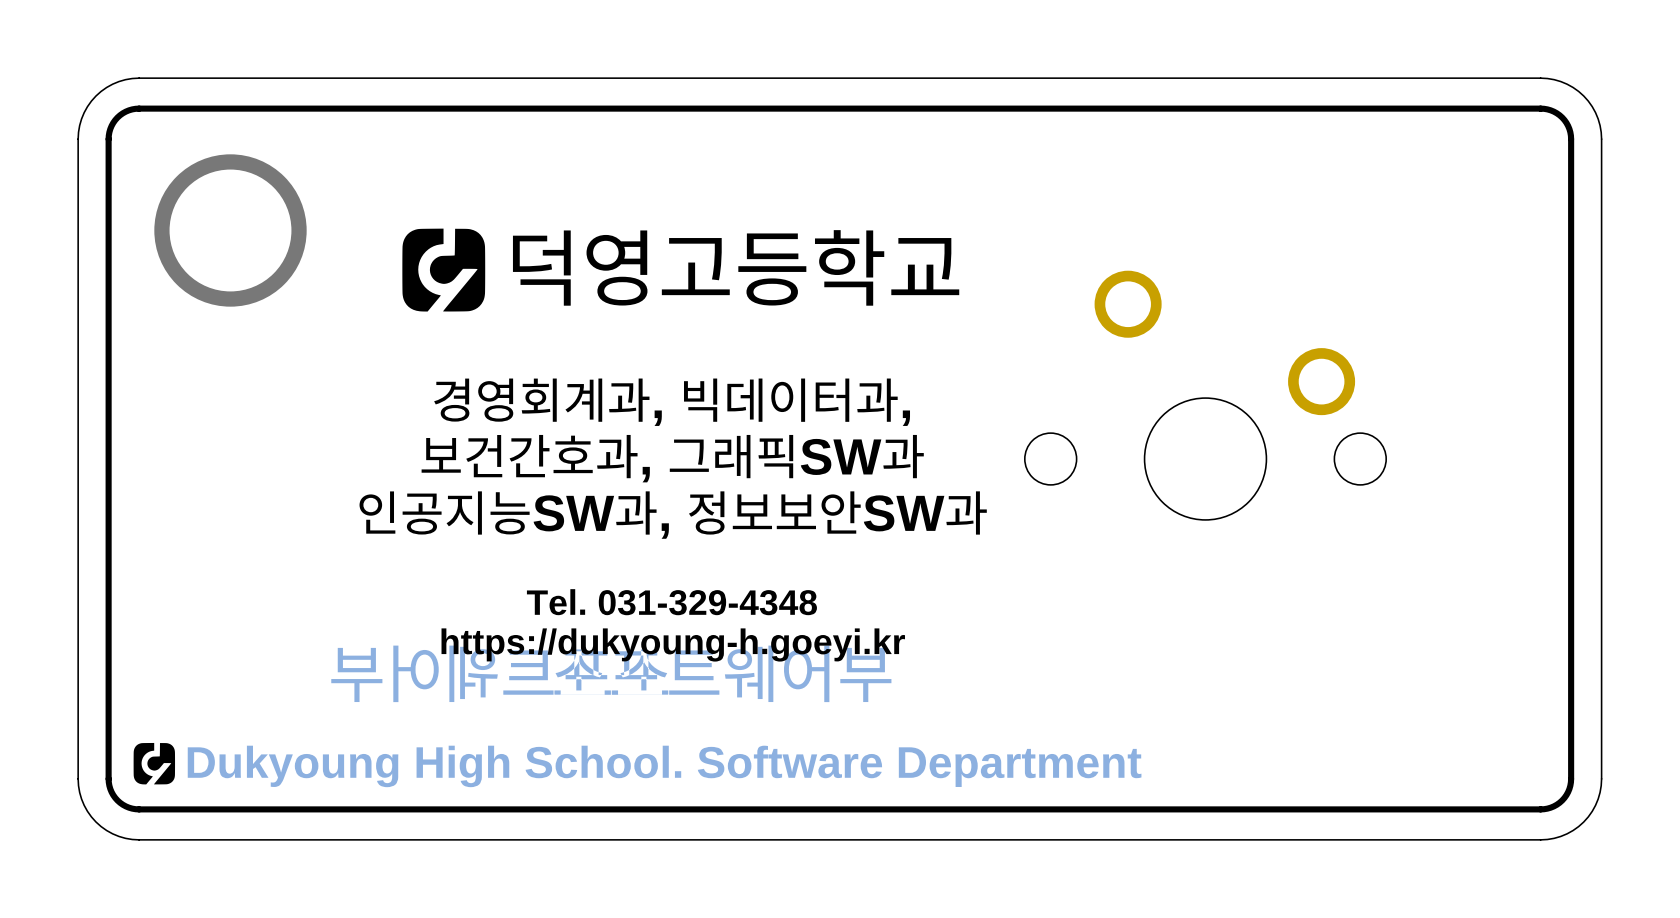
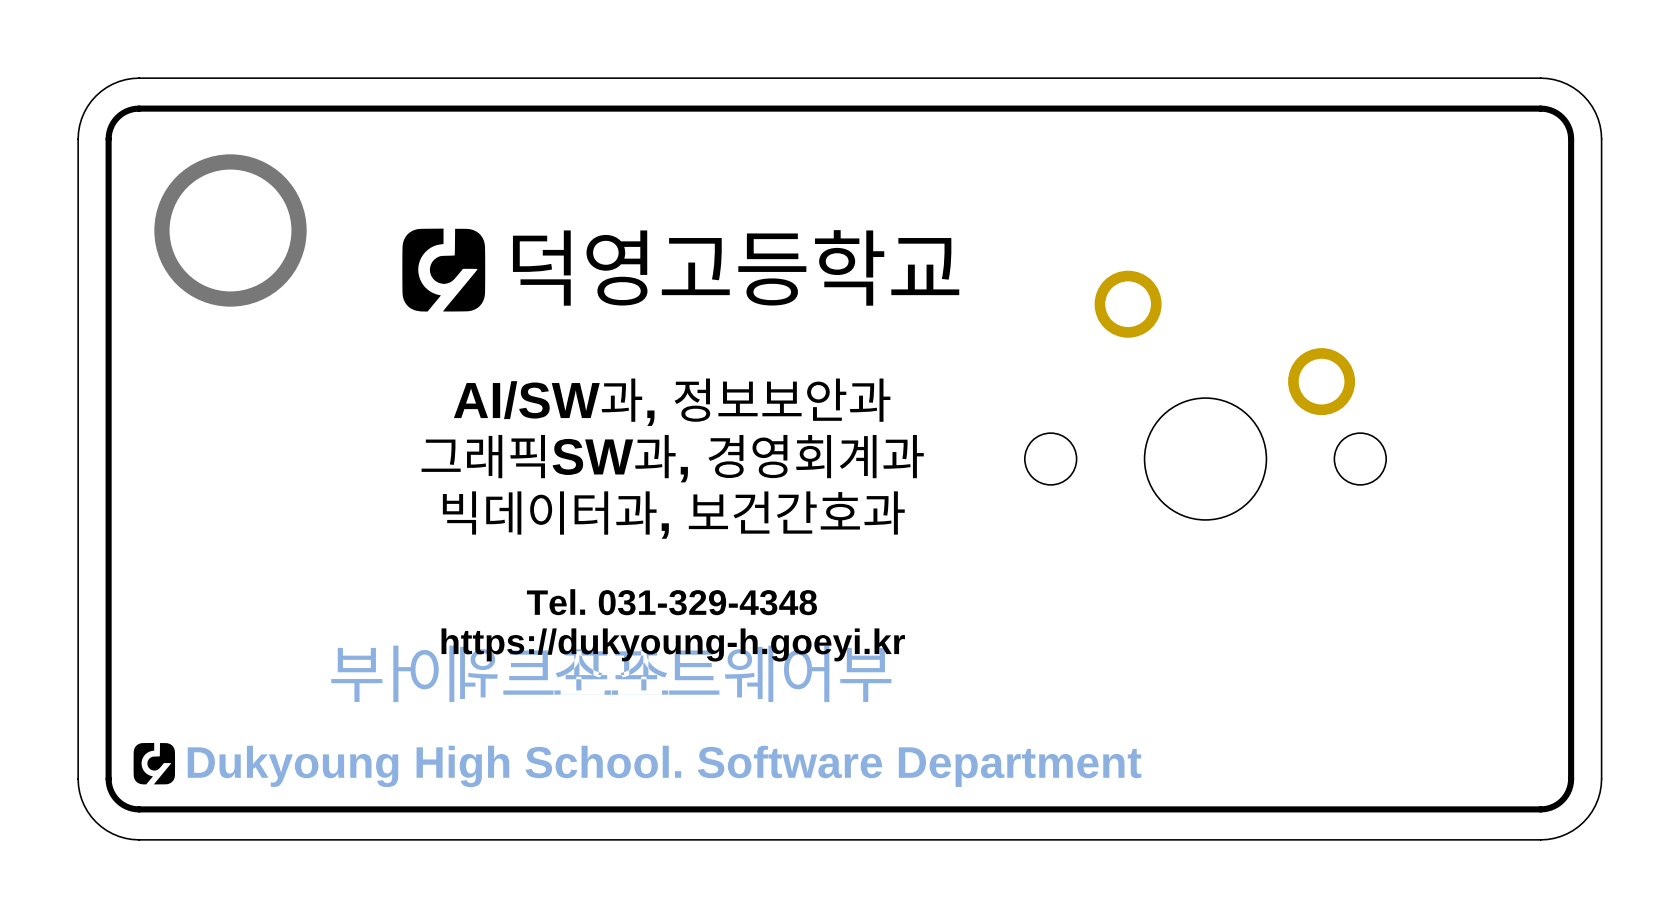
text: 경영회계과, 빅데이터과, (672, 402) -> AI/SW과, 정보보안과 (672, 402)
text: 보건간호과, 그래픽SW과 (672, 458) -> 그래픽SW과, 경영회계과 (672, 458)
text: 인공지능SW과, 정보보안SW과 (673, 515) -> 빅데이터과, 보건간호과 (673, 515)

